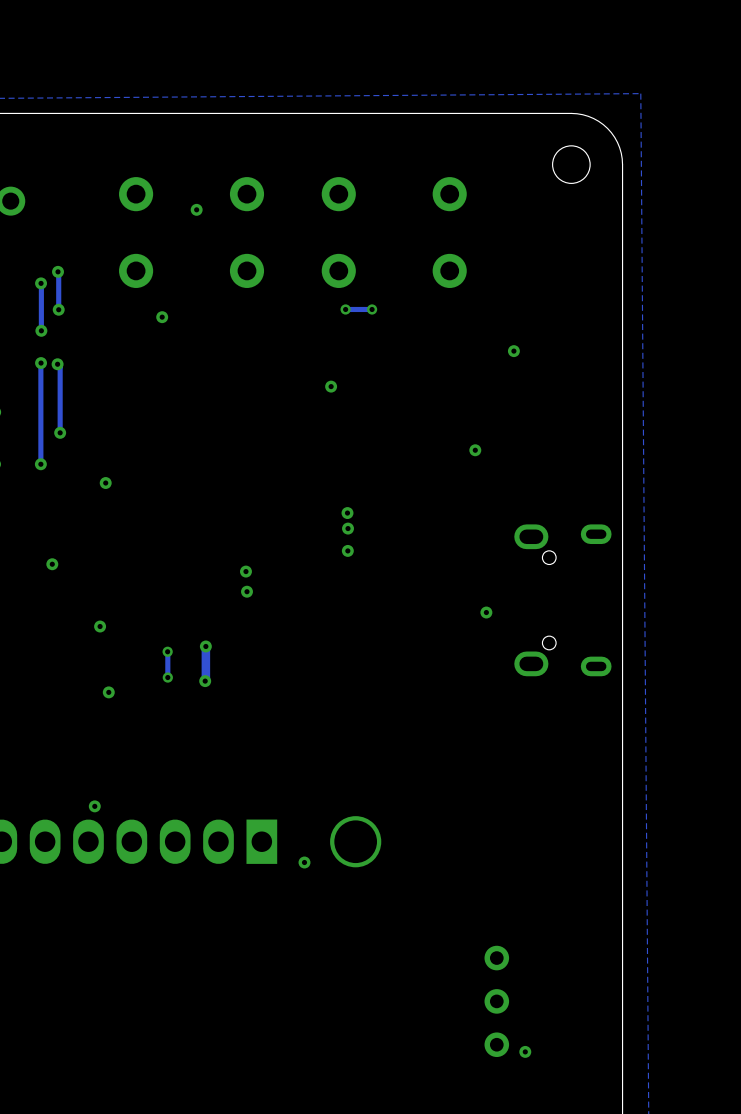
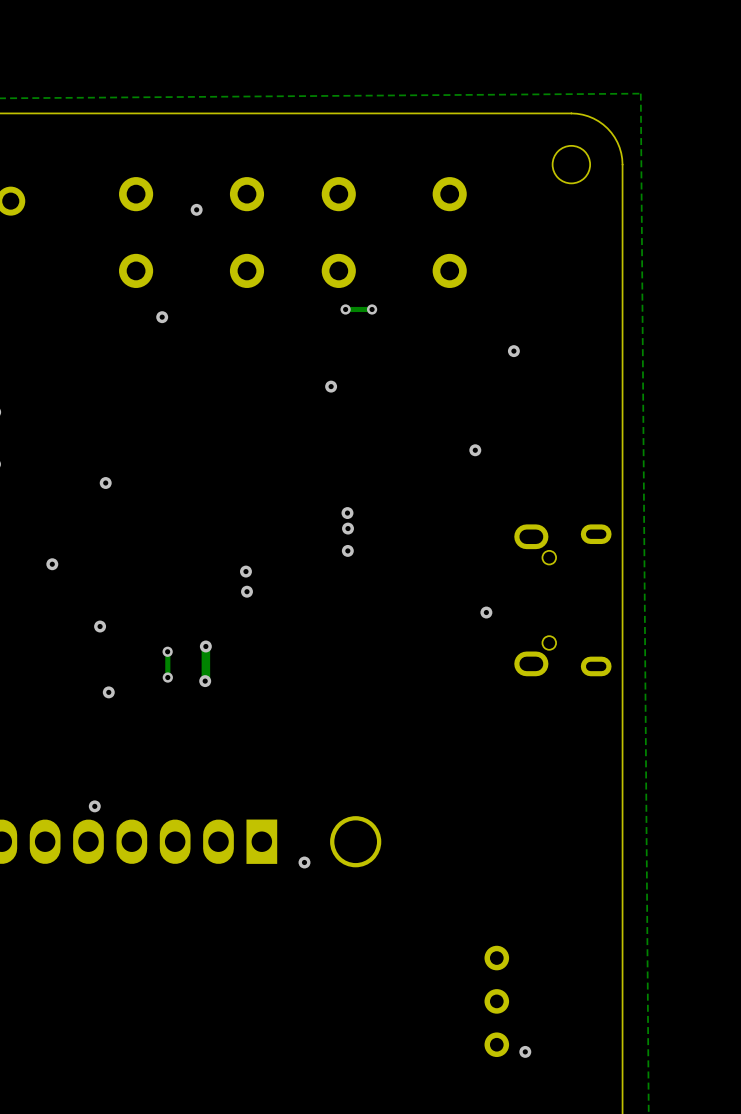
track: (58, 271) (58, 309) -> none
via: (58, 271) -> none
track: (41, 283) (41, 330) -> none
via: (41, 283) -> none
via: (58, 309) -> none
via: (41, 330) -> none
track: (40, 363) (40, 464) -> none
via: (41, 363) -> none
track: (57, 364) (60, 366) (60, 432) -> none
via: (57, 364) -> none
via: (60, 432) -> none
via: (40, 464) -> none

